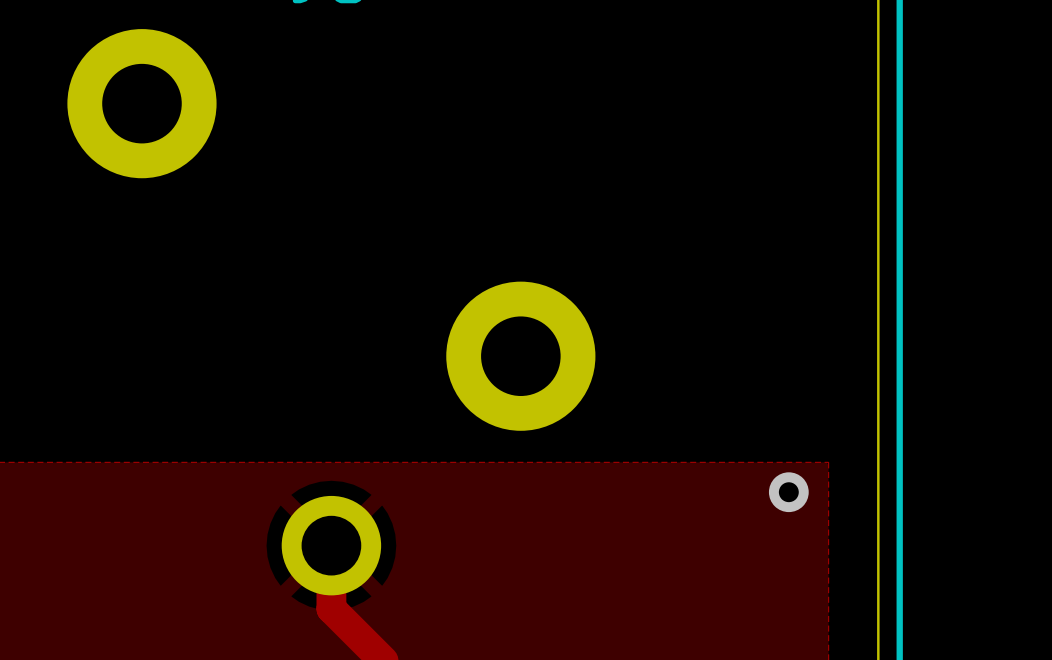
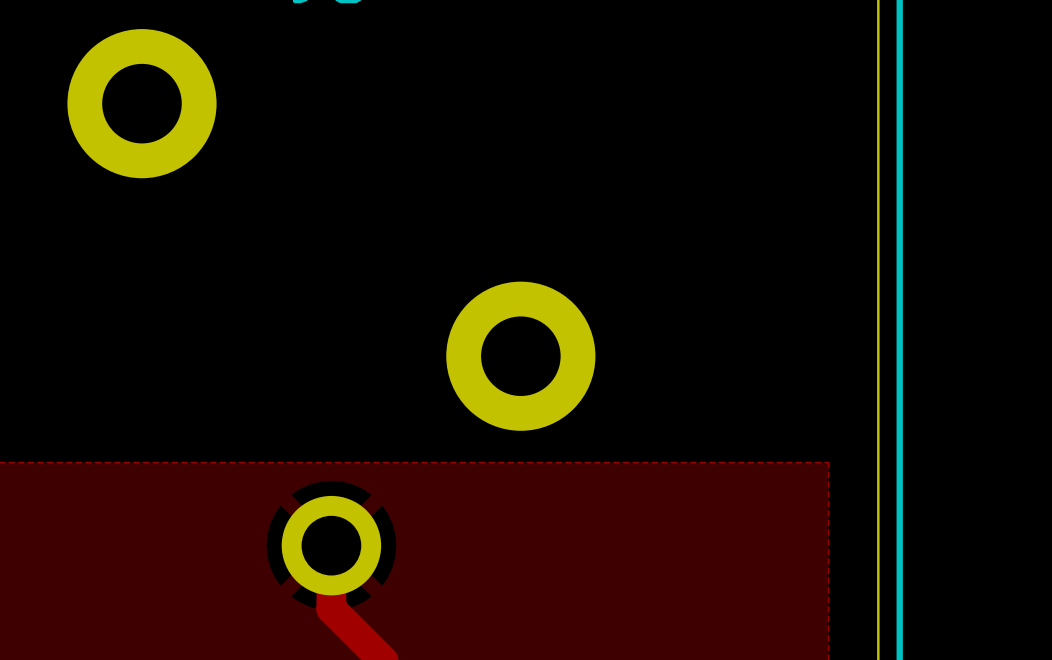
via: (788, 492) -> none

